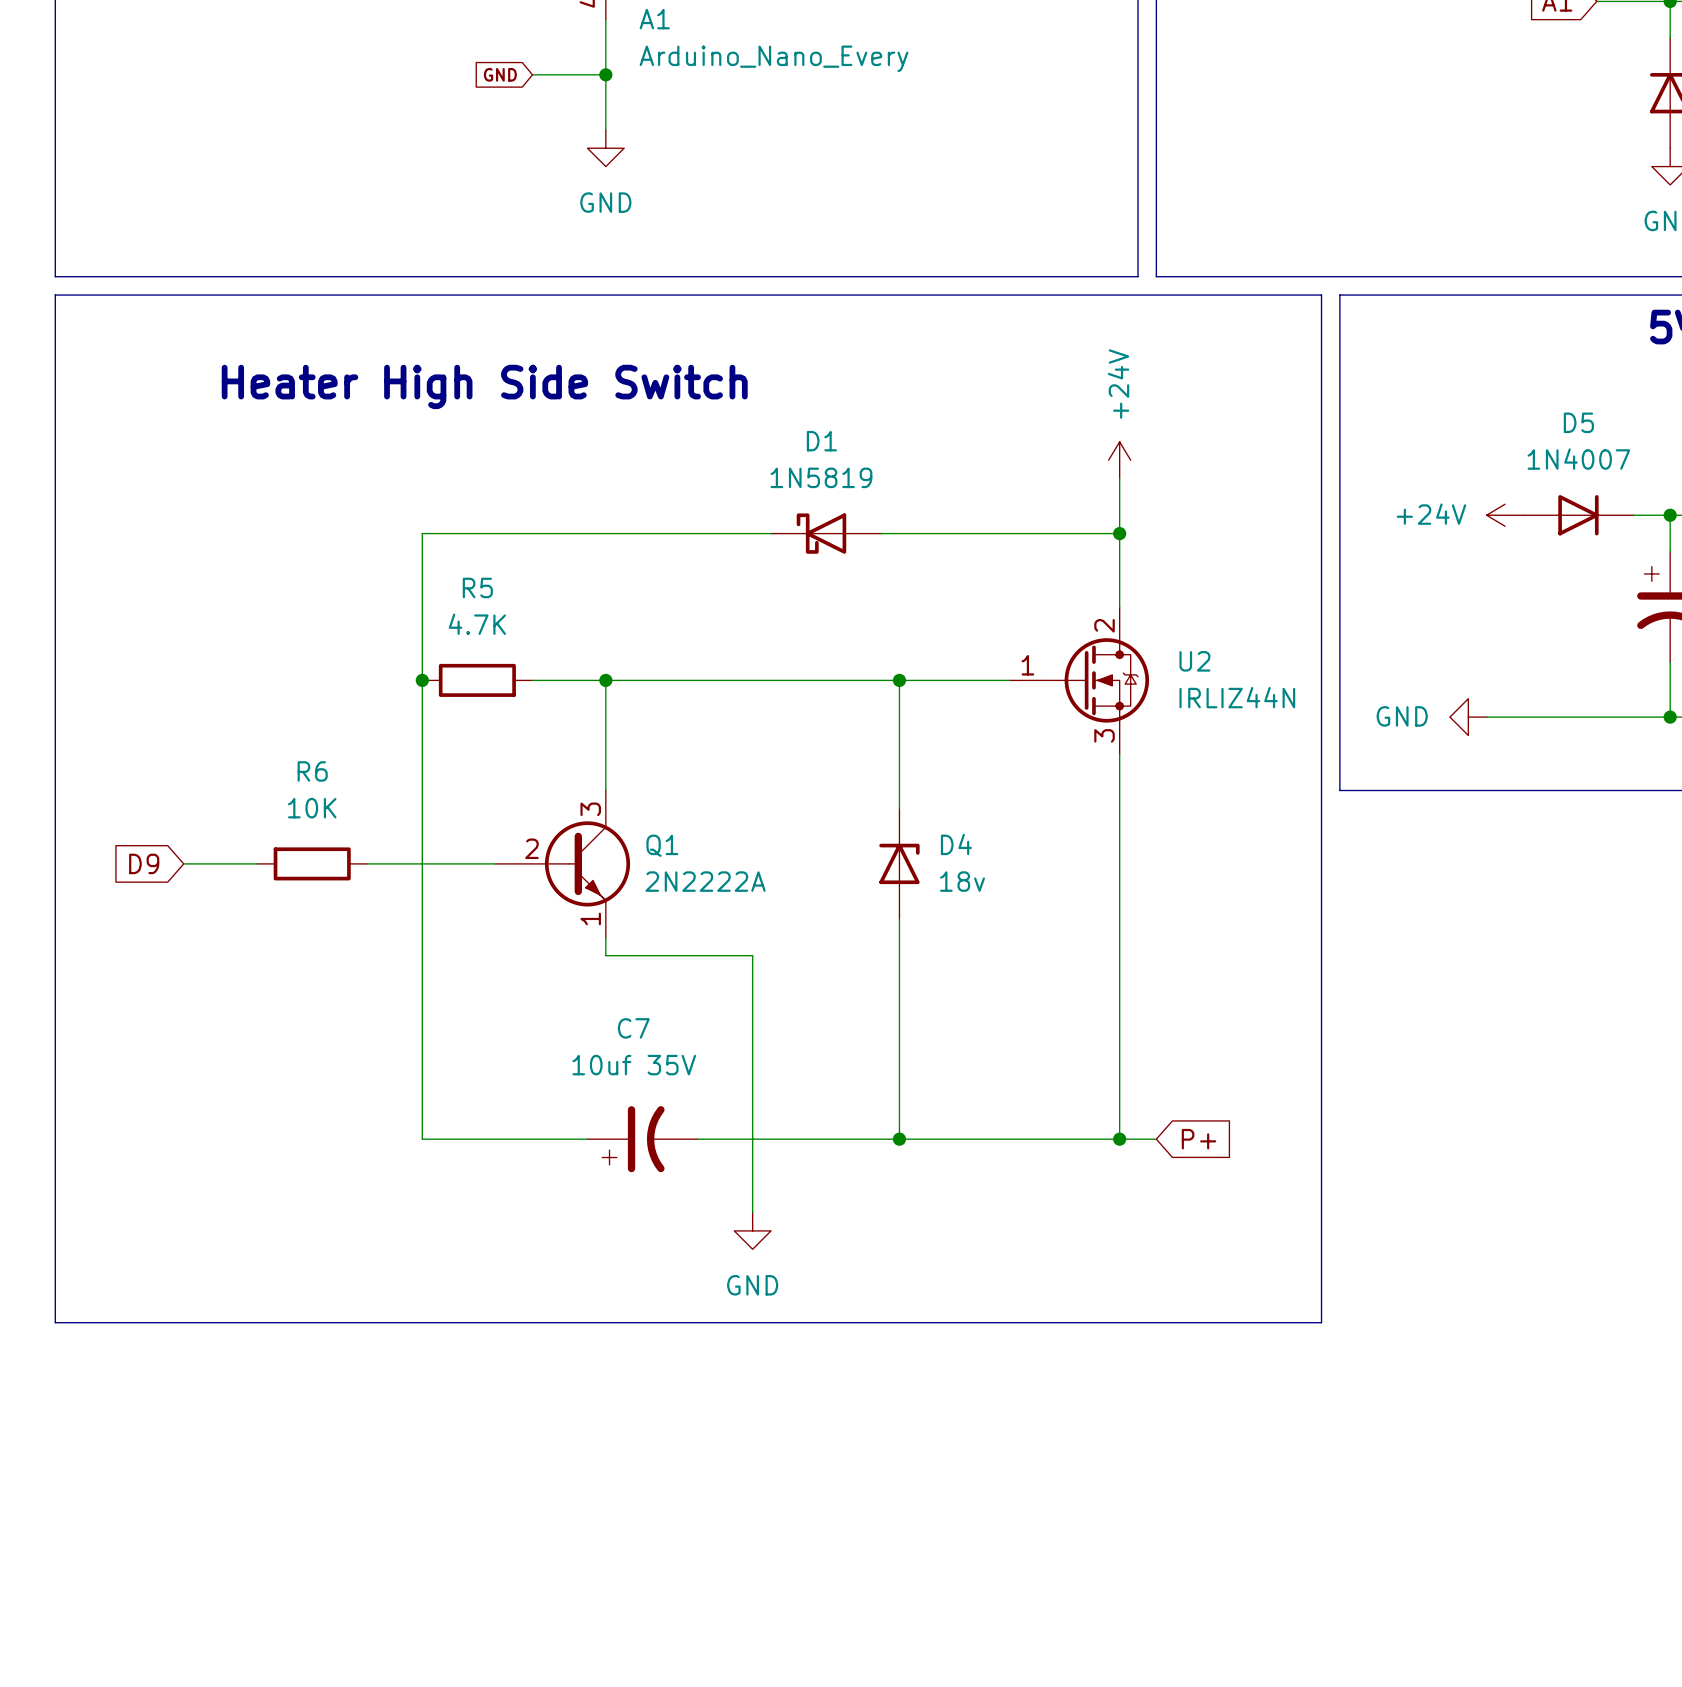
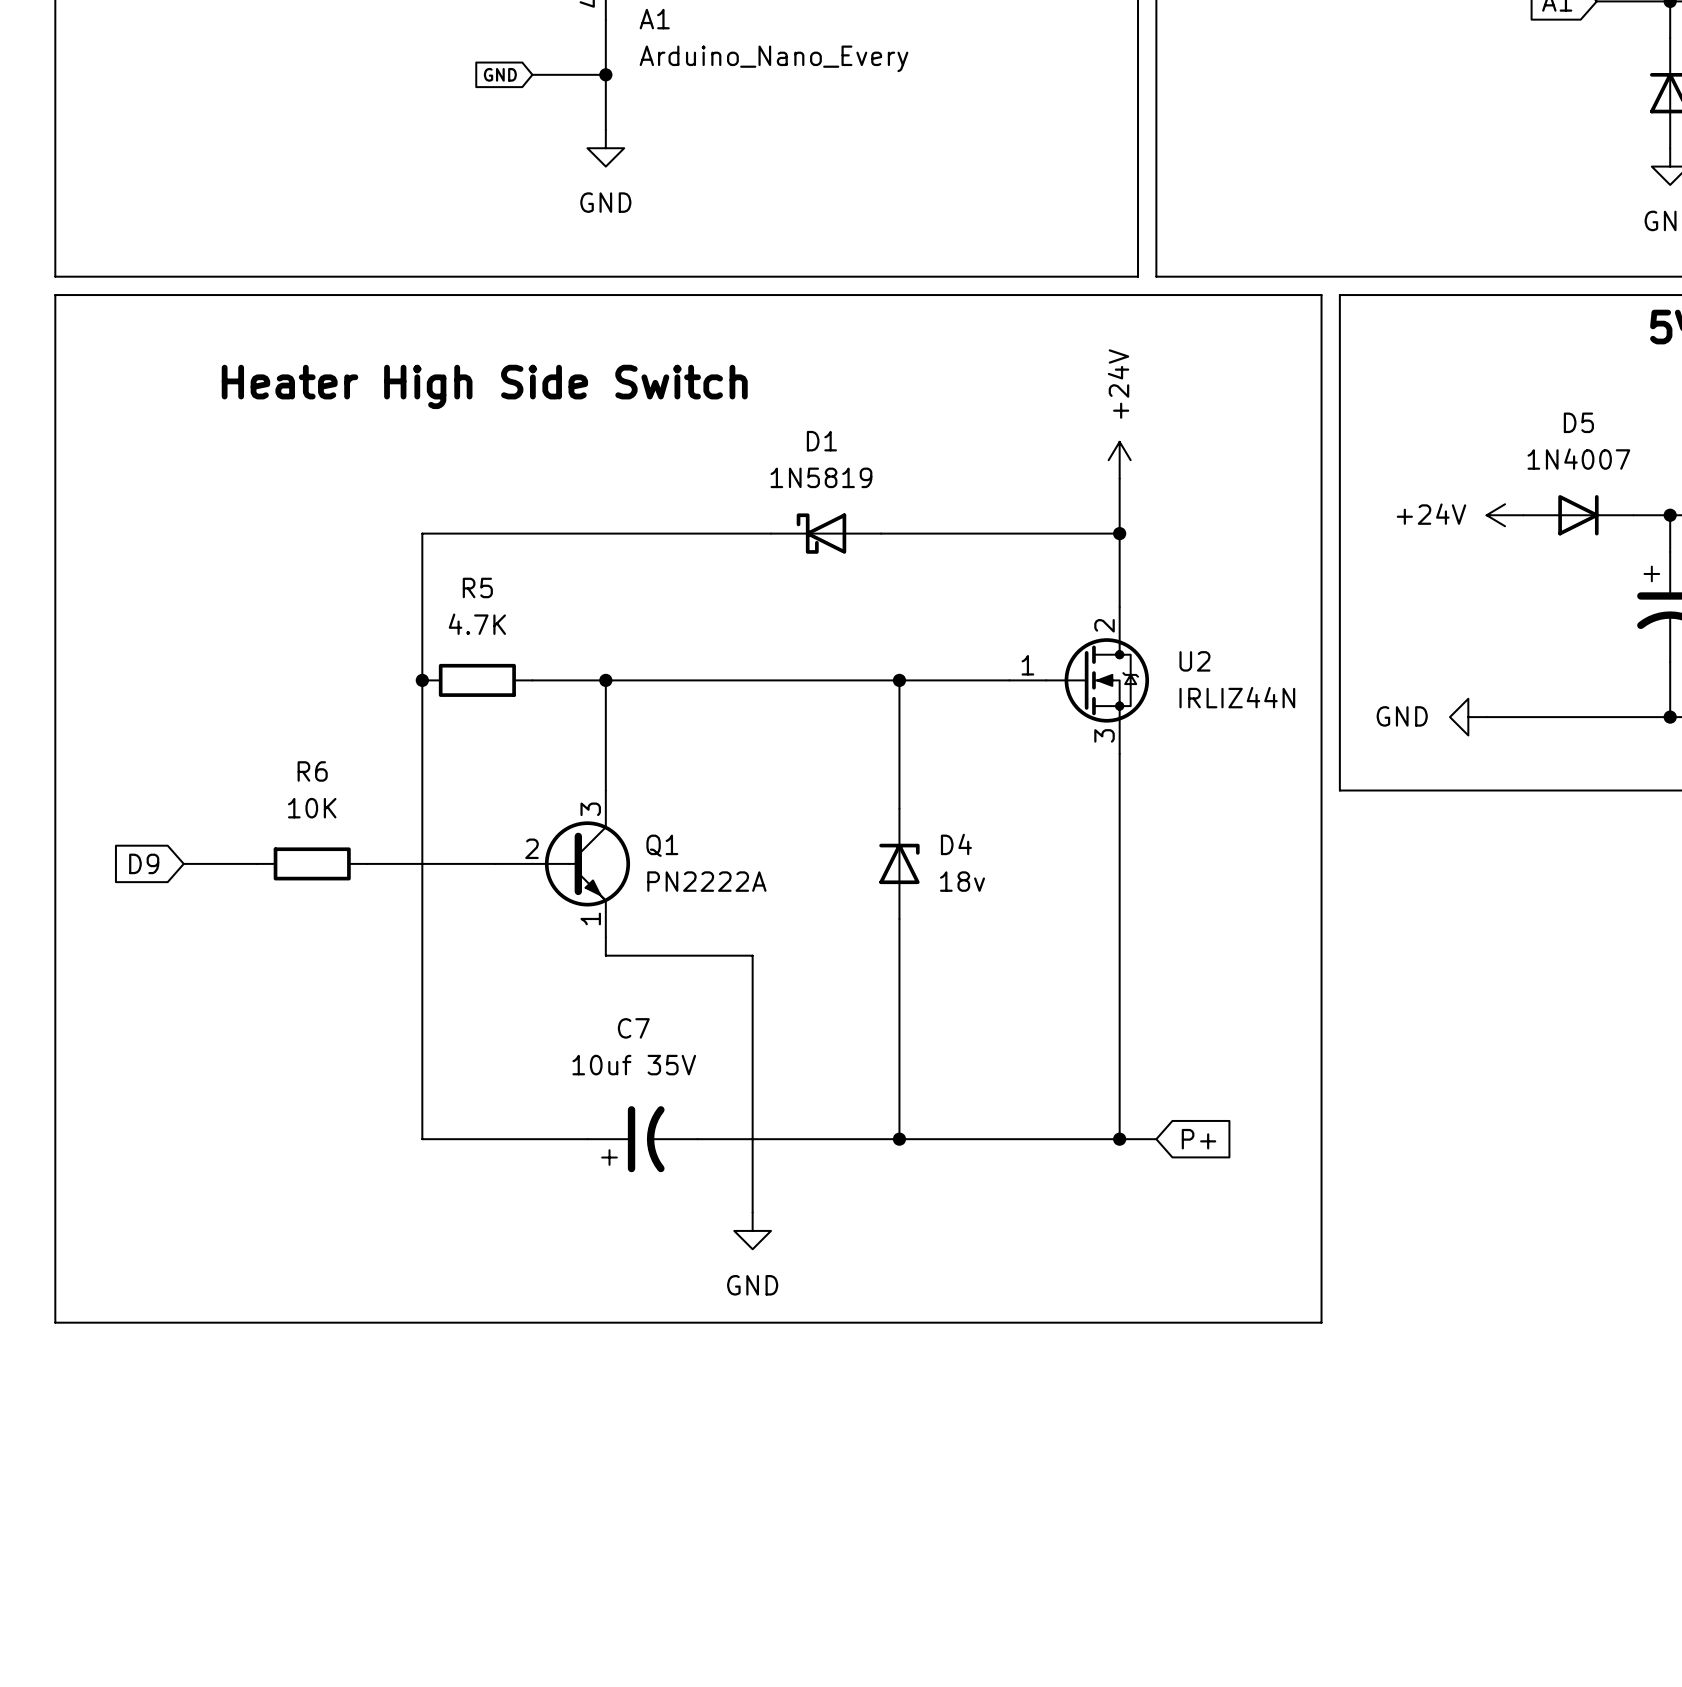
Q1 value: 2N2222A (705, 881) -> PN2222A (706, 881)

